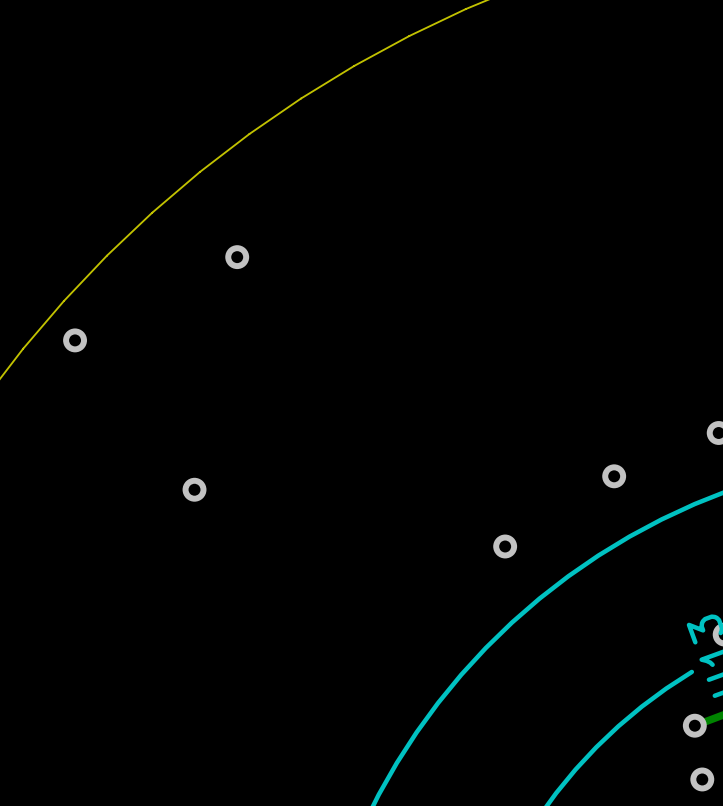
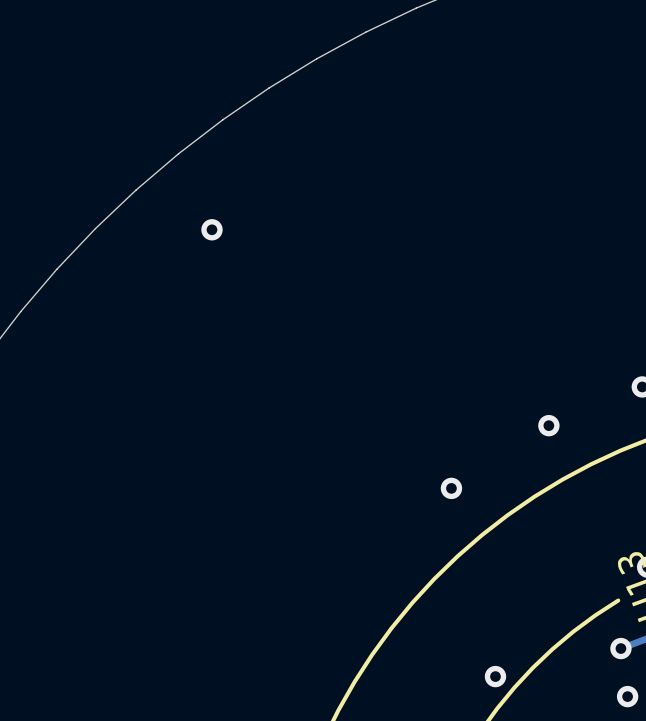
via: (75, 340) -> none
via: (194, 489) -> none
via: none -> (495, 676)

